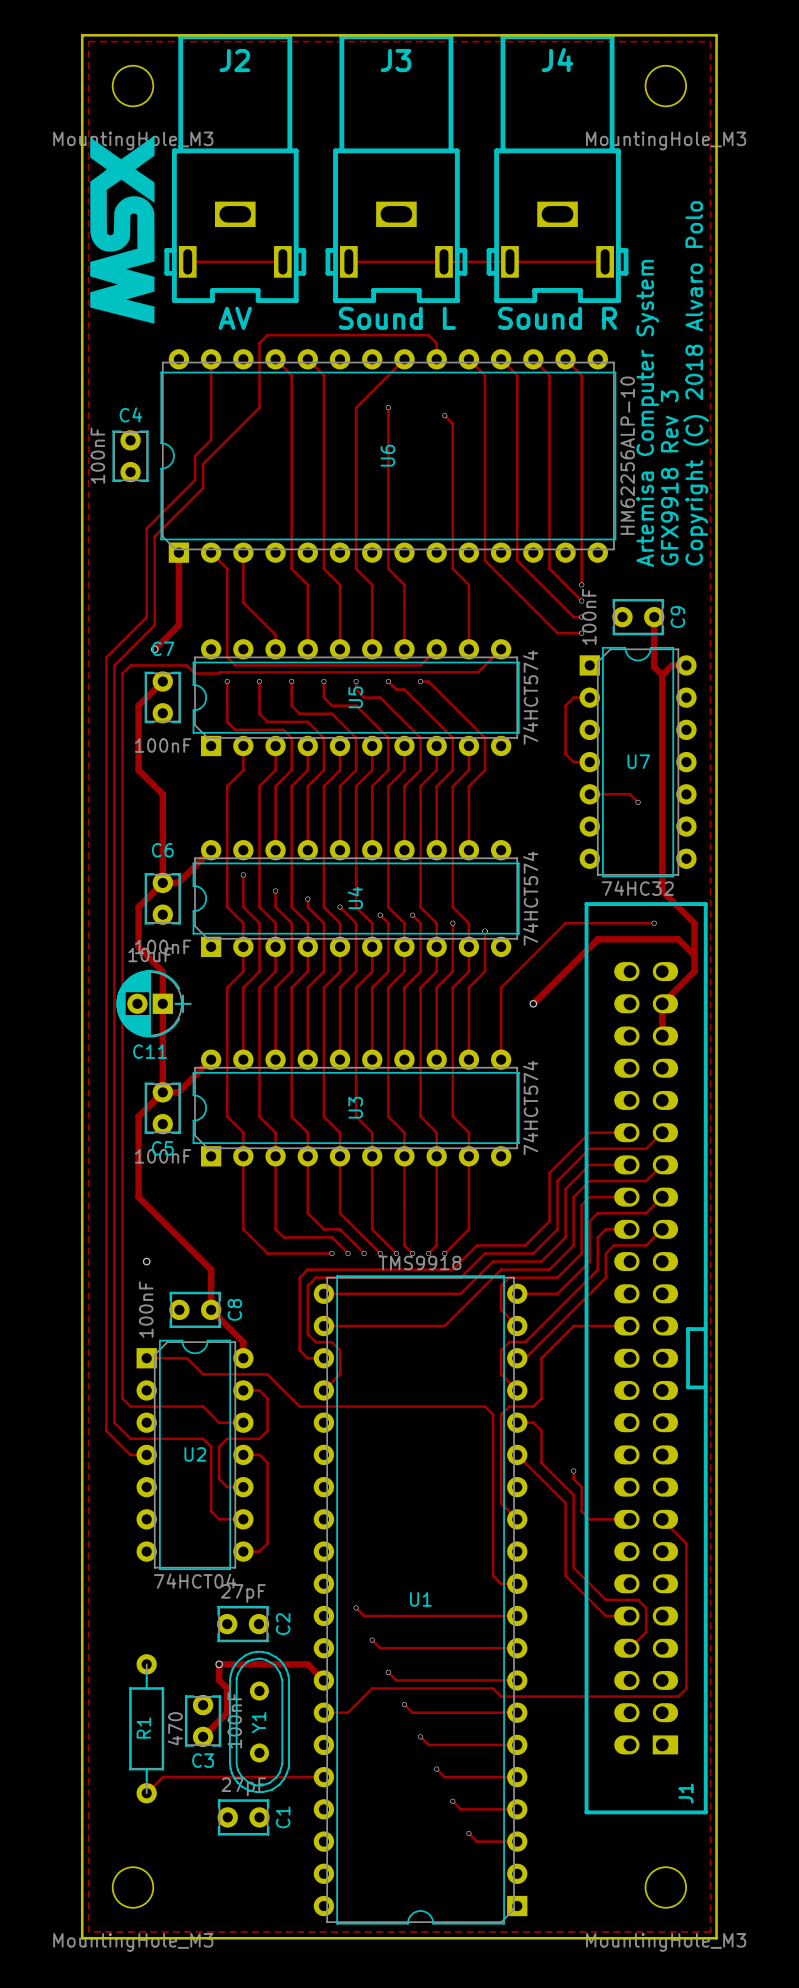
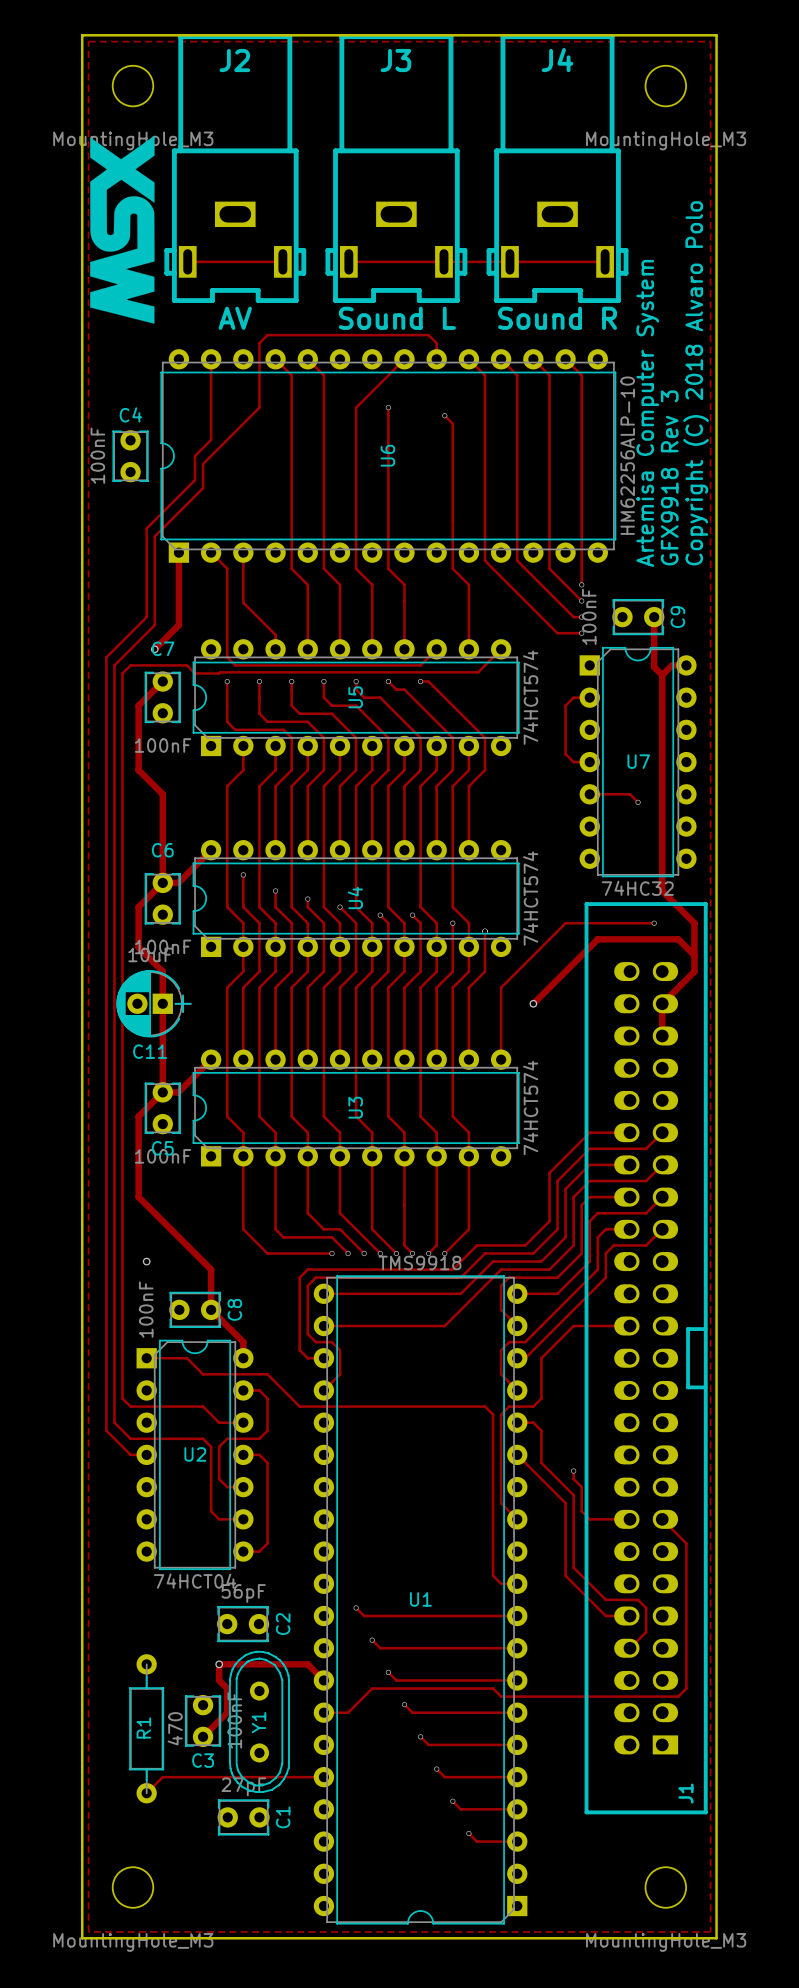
C2 value: 27pF (243, 1593) -> 56pF (243, 1593)

